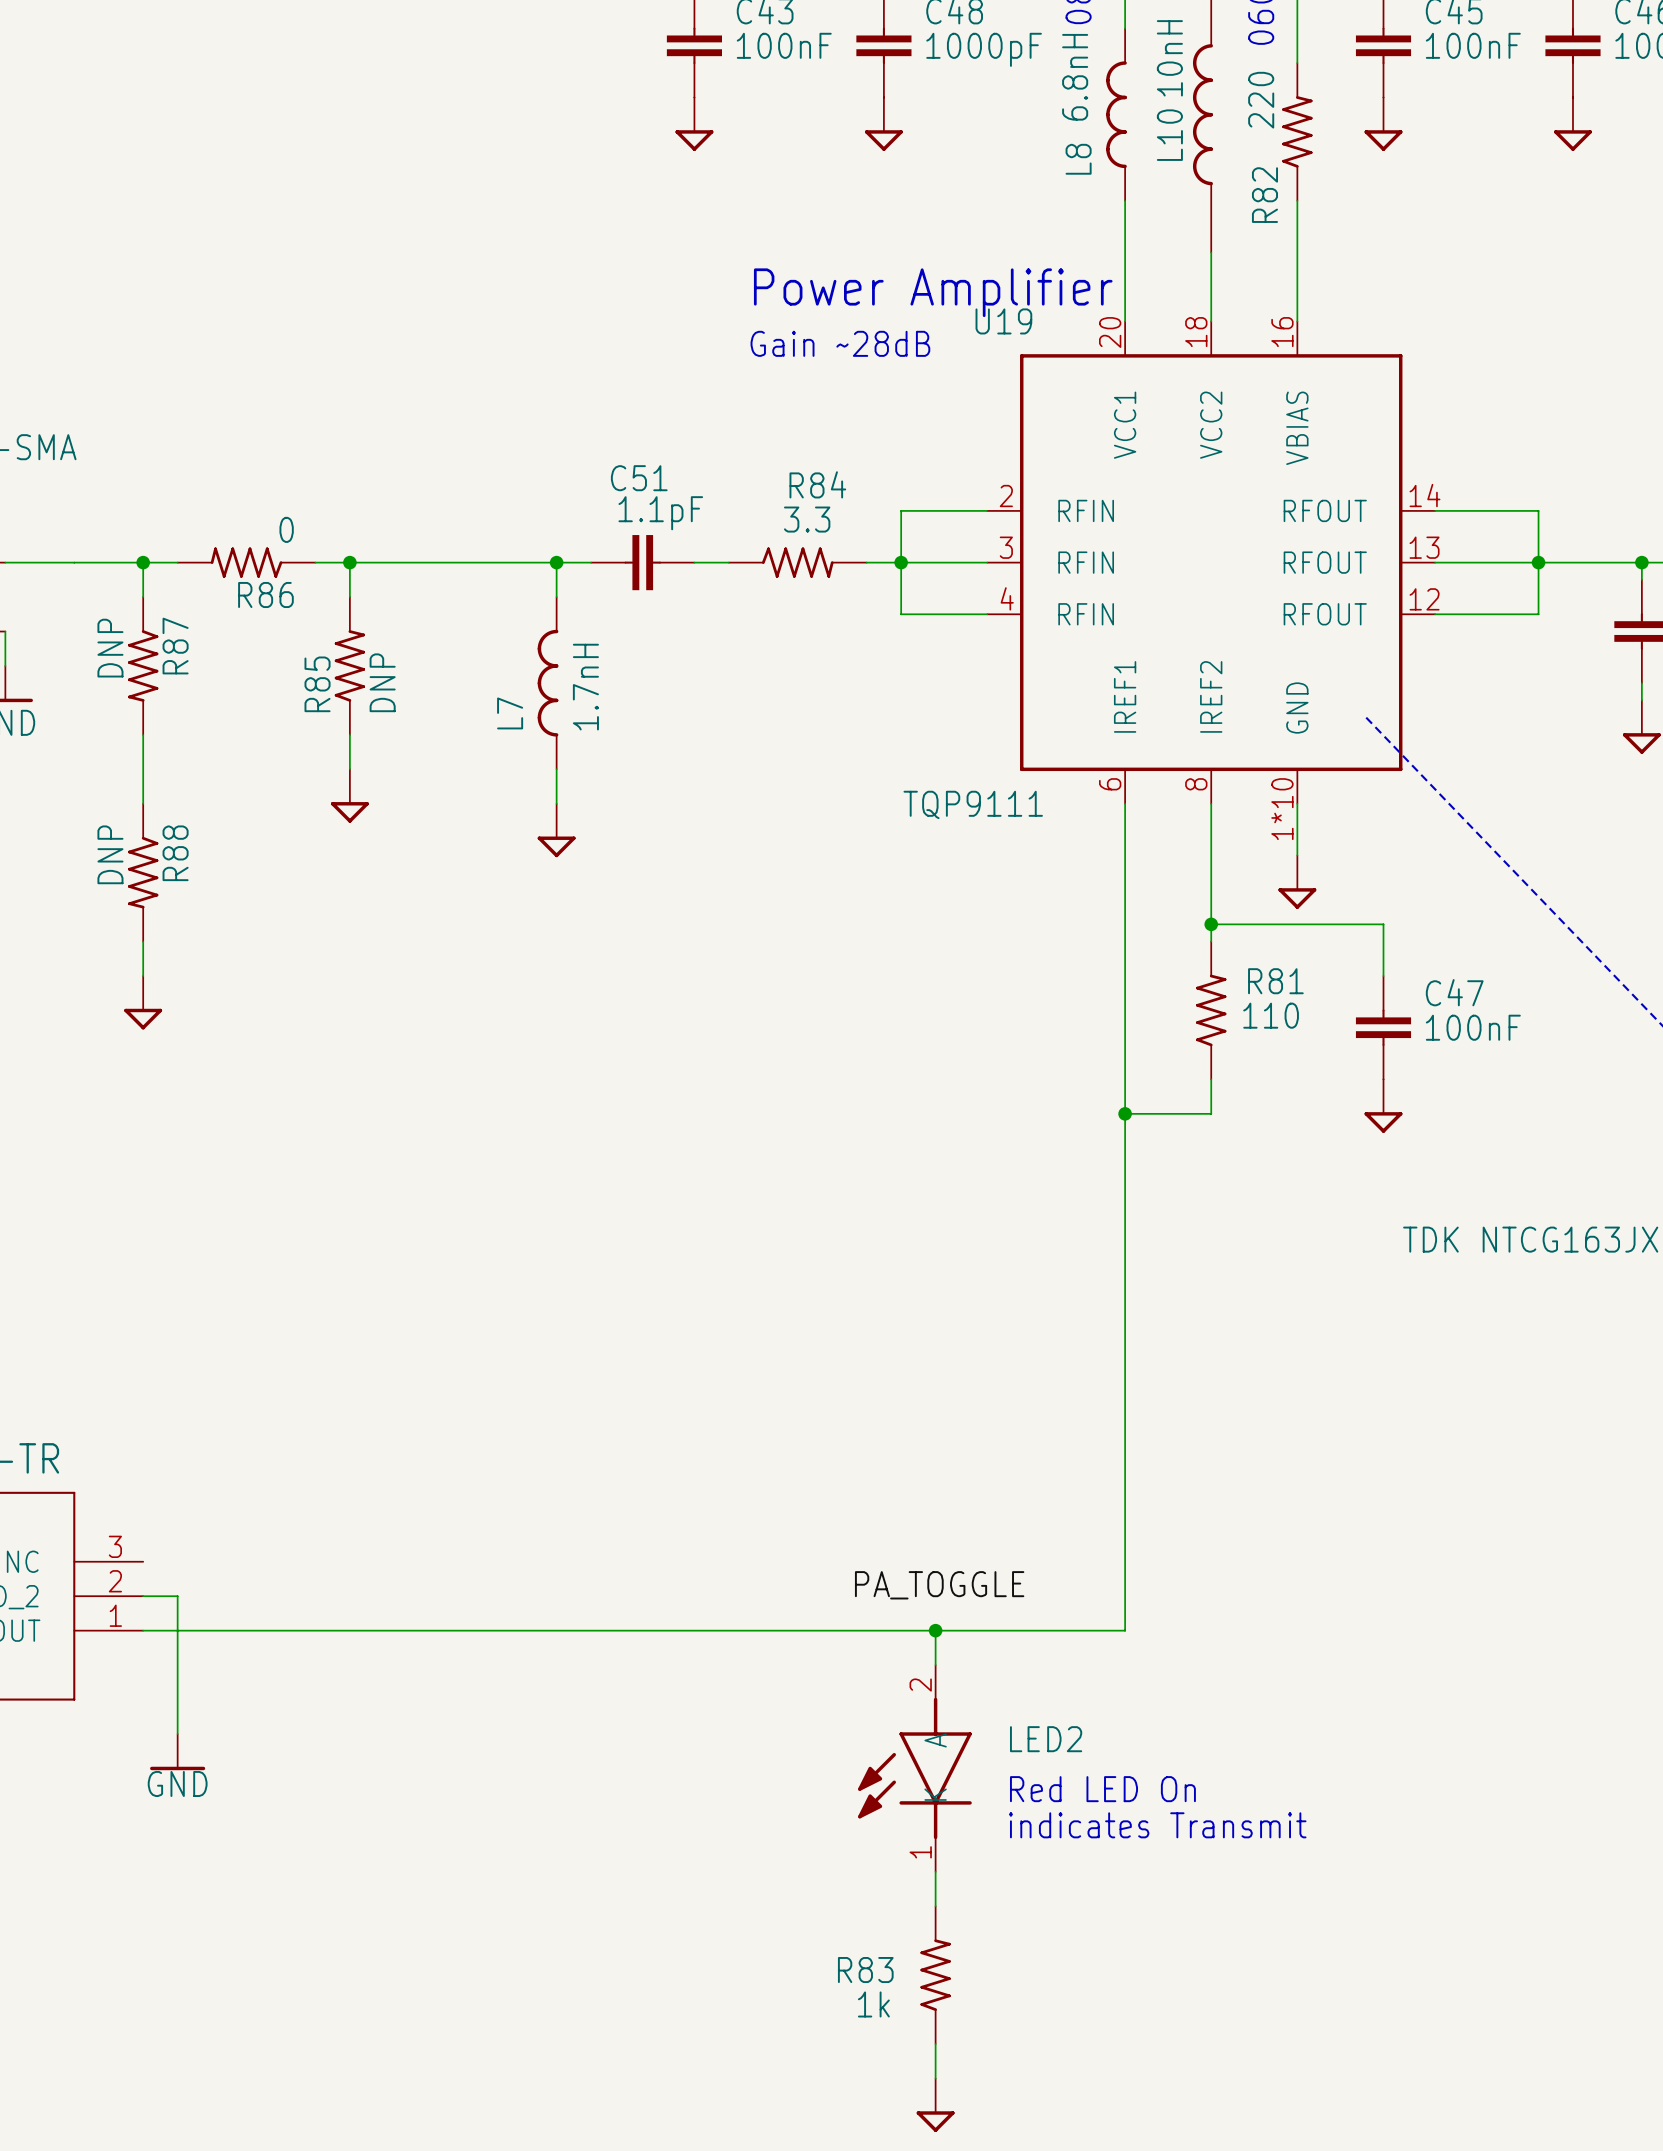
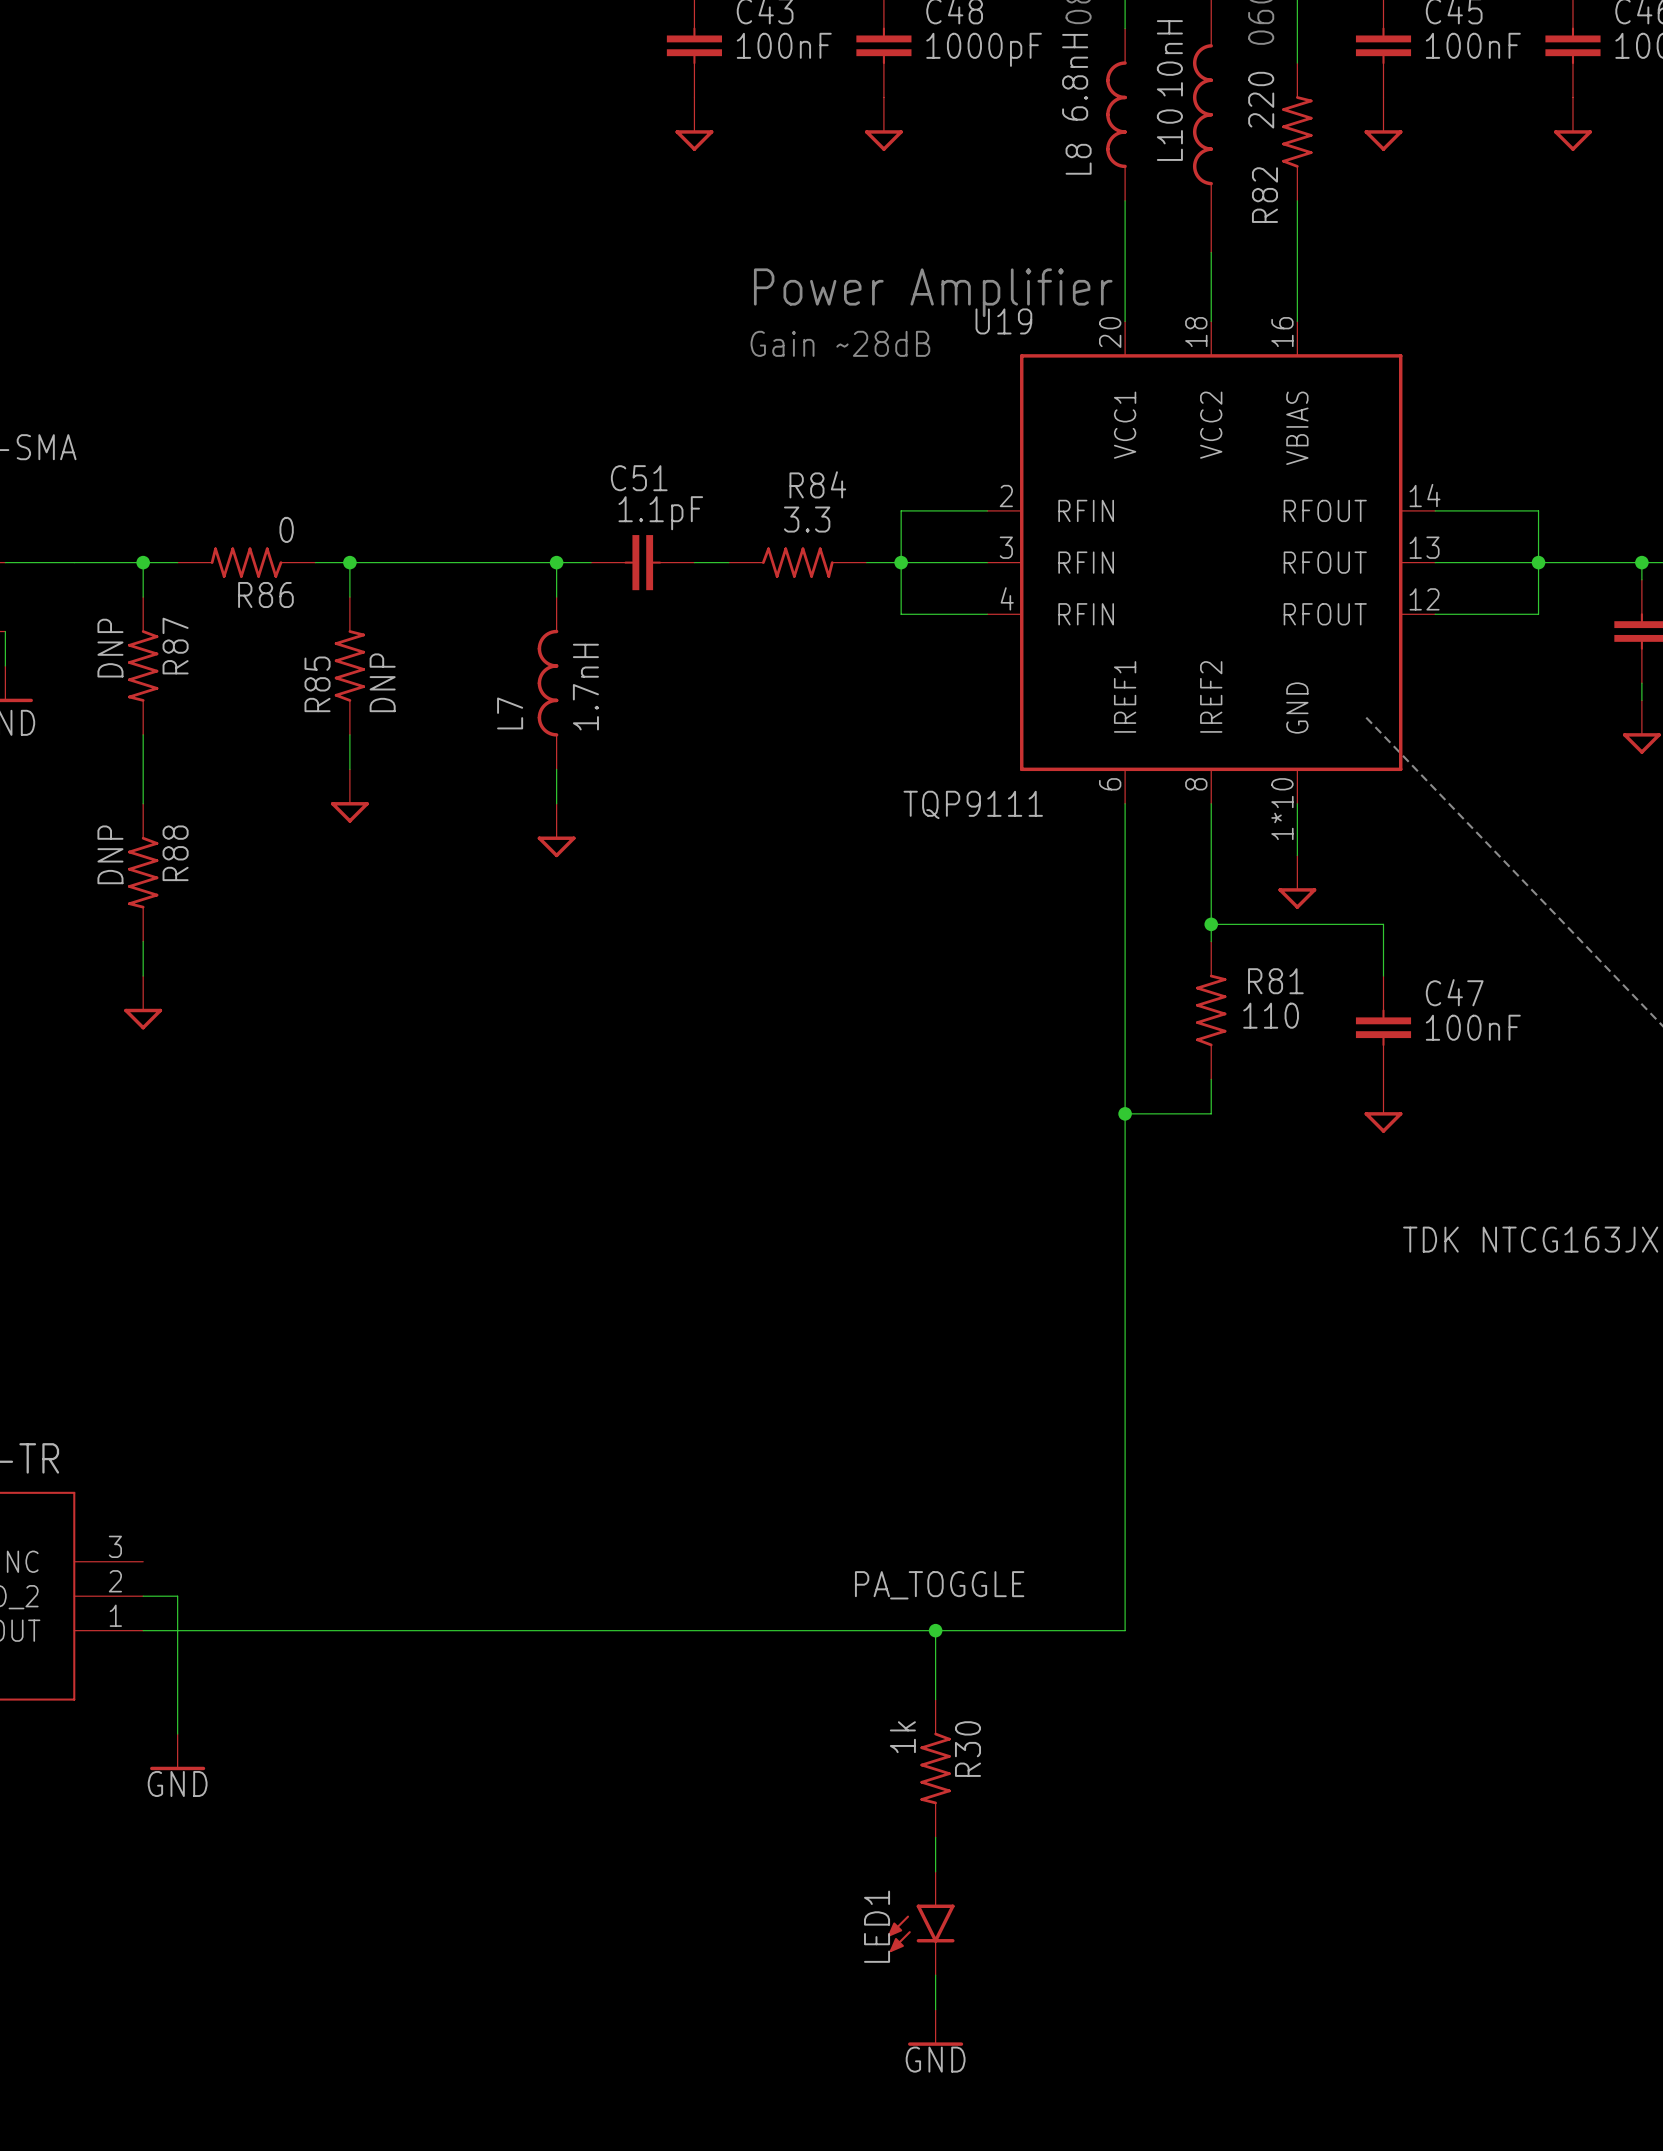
LED2: (914, 1768) -> none
R30: none -> 1k (935, 1768)
text: Red LED On (1102, 1789) -> none
text: indicates Transmit (1157, 1825) -> none
LED1: none -> (921, 1923)
R83: 1k (935, 1975) -> none
power symbol: none -> GND (935, 2027)
wire: (935, 2044) (935, 2078) -> (935, 1975) (935, 2009)
power symbol: (935, 2105) -> none

